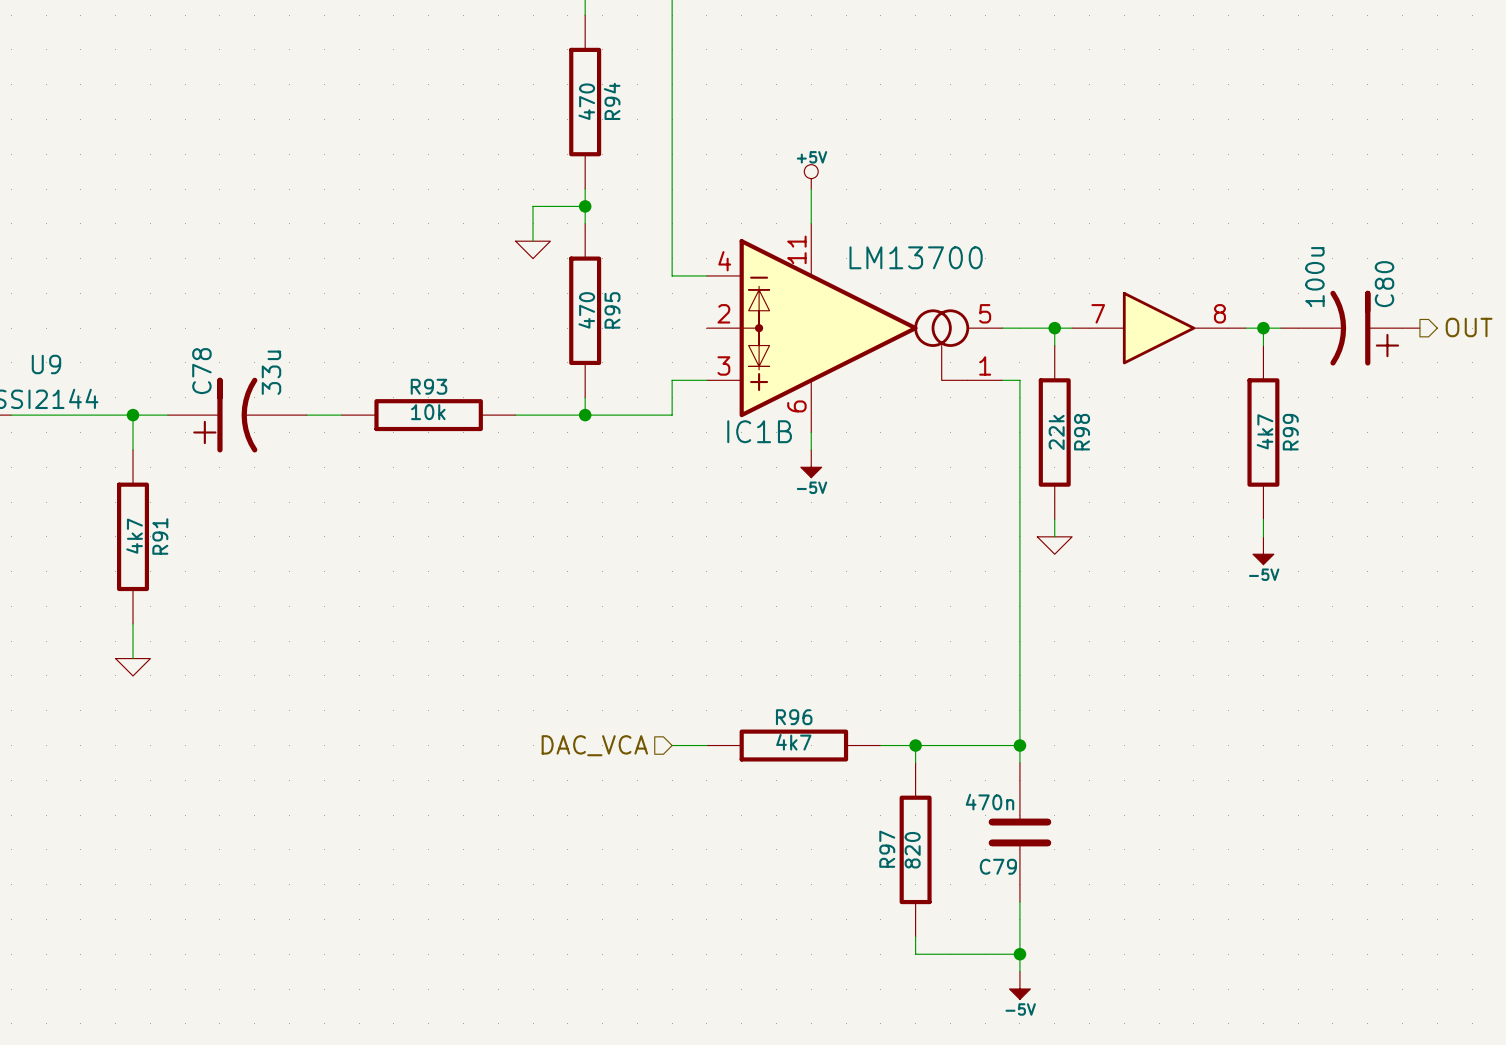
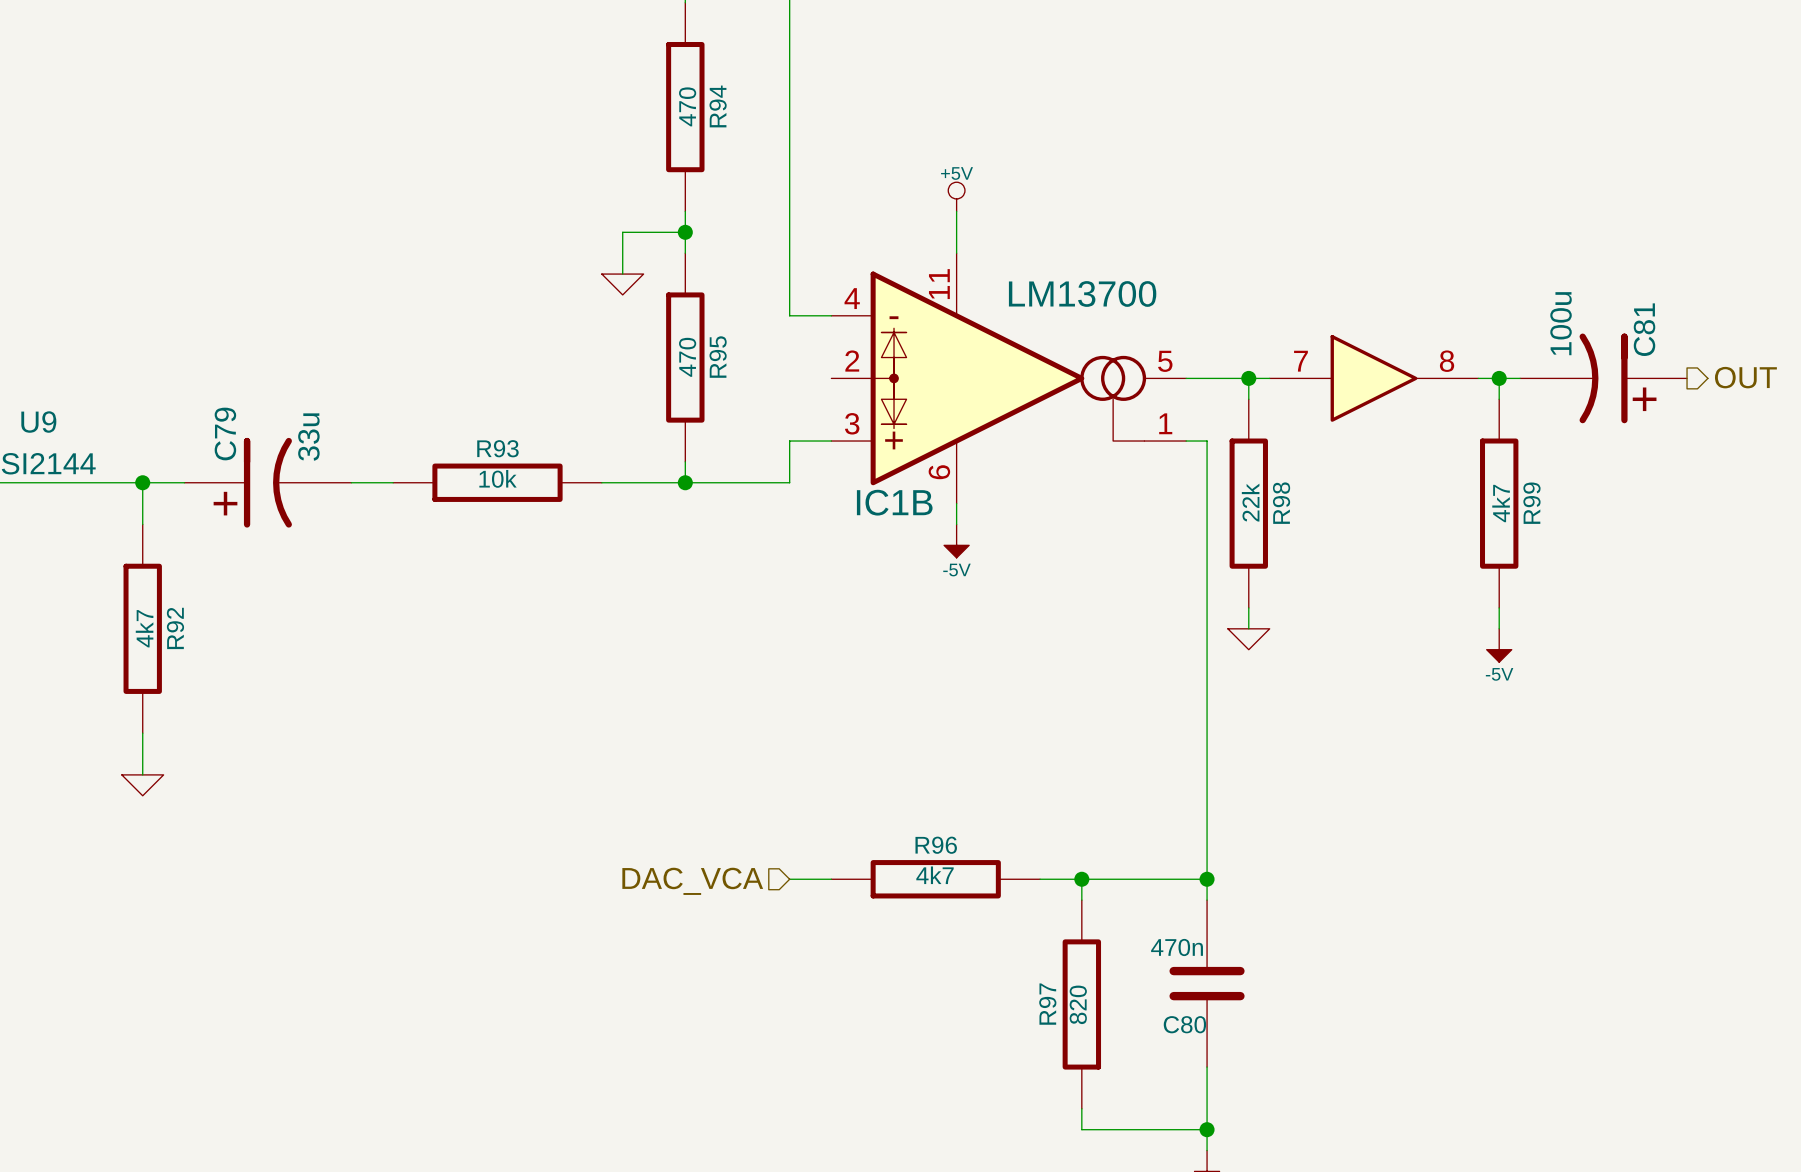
C80 name: C80 (1384, 284) -> C81 (1644, 329)
C78 name: C78 (201, 371) -> C79 (225, 434)
R91 name: R91 (160, 536) -> R92 (175, 628)
C79 name: C79 (998, 866) -> C80 (1184, 1024)

